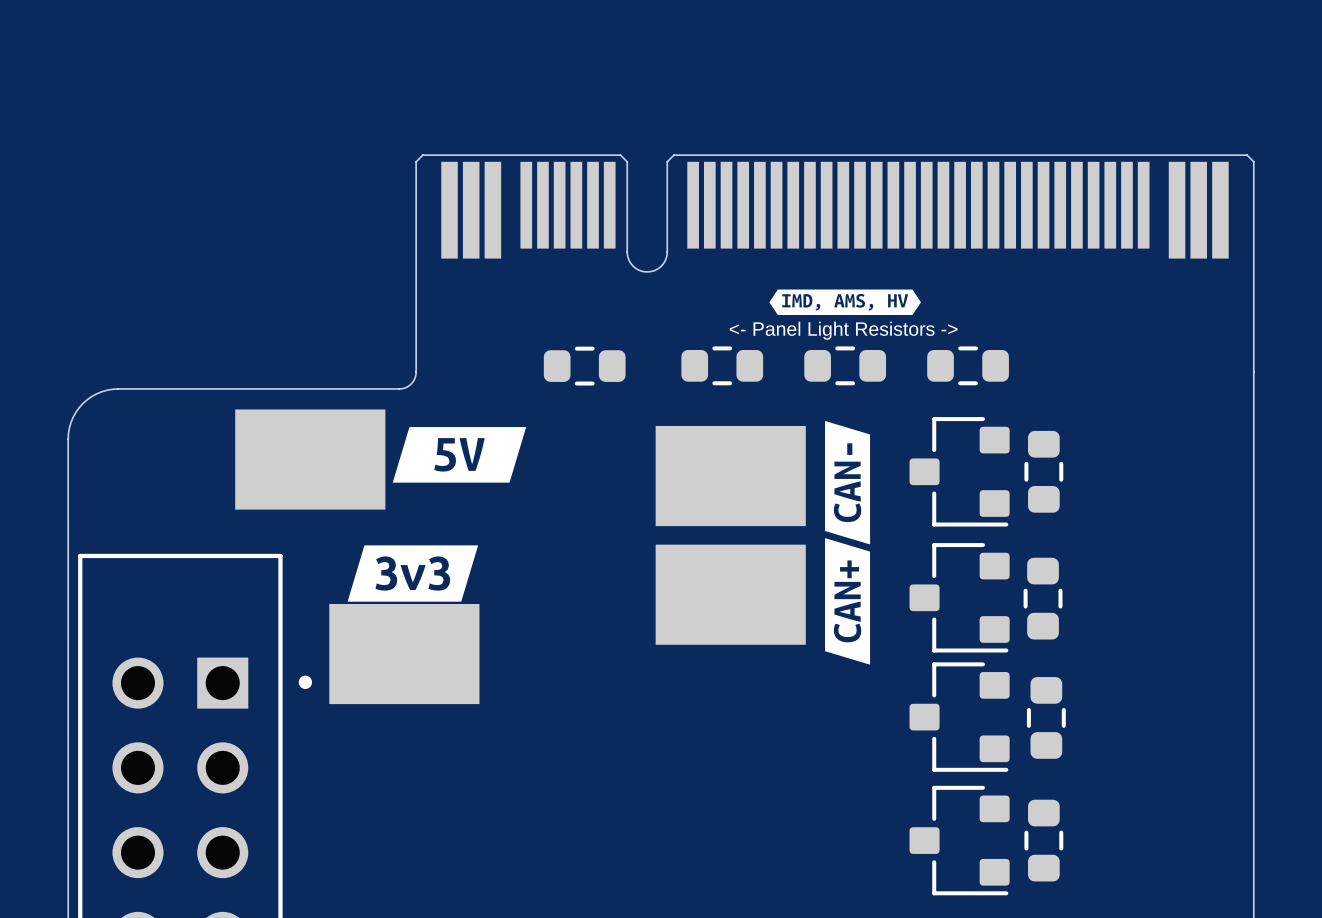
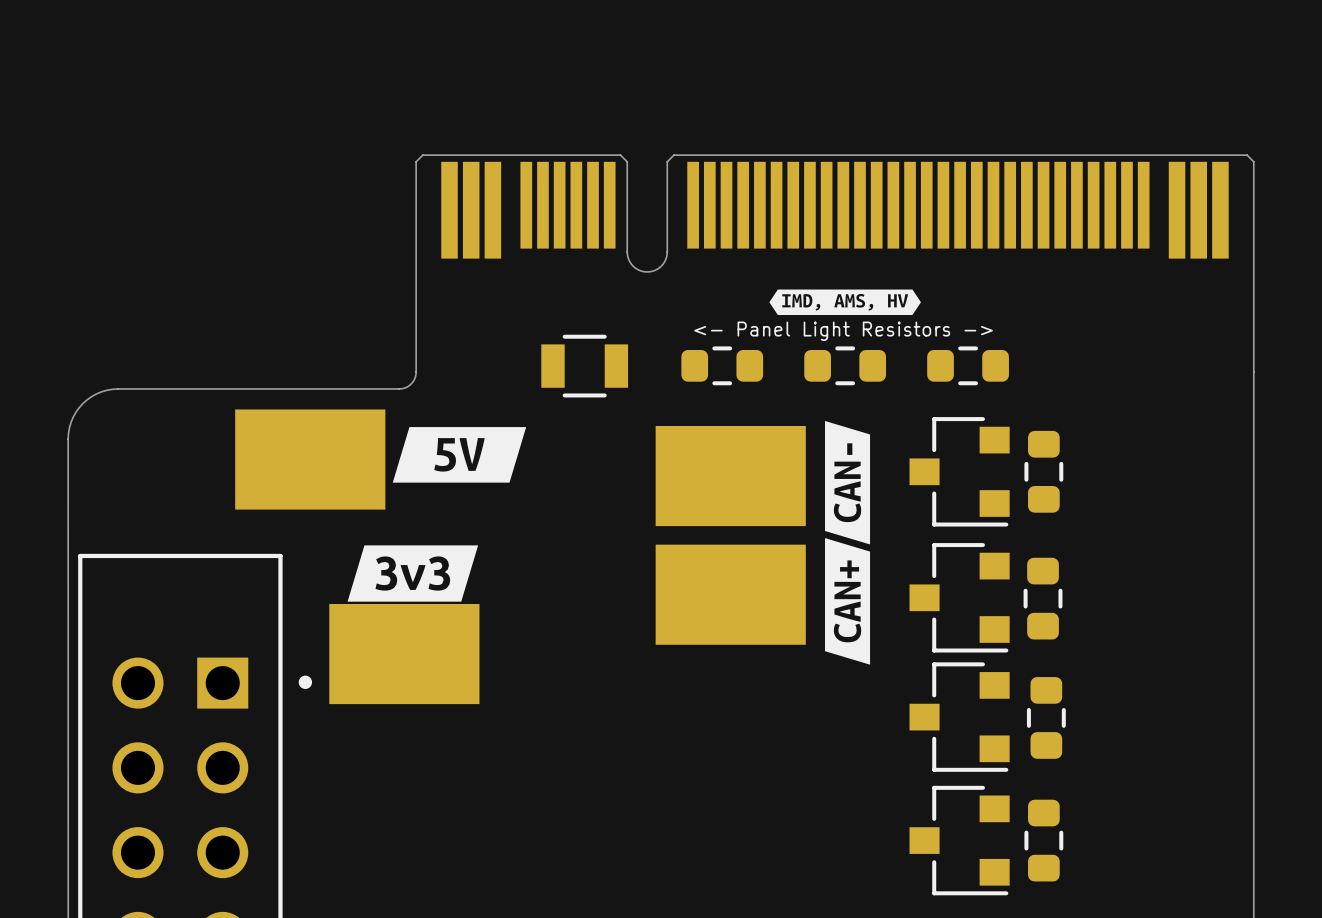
part footprint: [543, 346, 626, 386] -> [541, 334, 629, 398]
part footprint: [909, 417, 1010, 527] -> [909, 417, 1010, 527]
part footprint: [909, 543, 1010, 653] -> [909, 543, 1010, 653]
part footprint: [909, 662, 1010, 772] -> [909, 662, 1010, 772]
part footprint: [909, 785, 1010, 896] -> [909, 785, 1010, 896]

